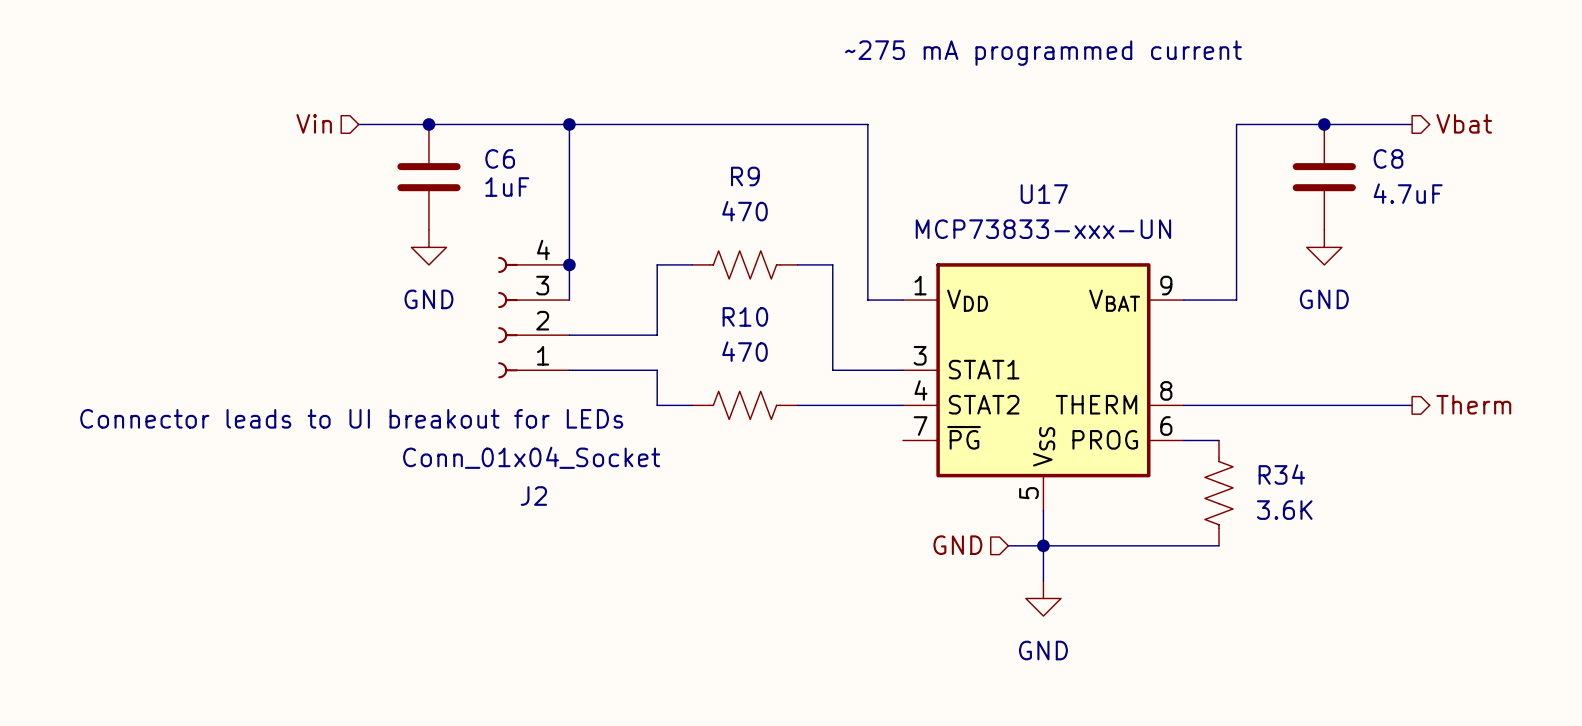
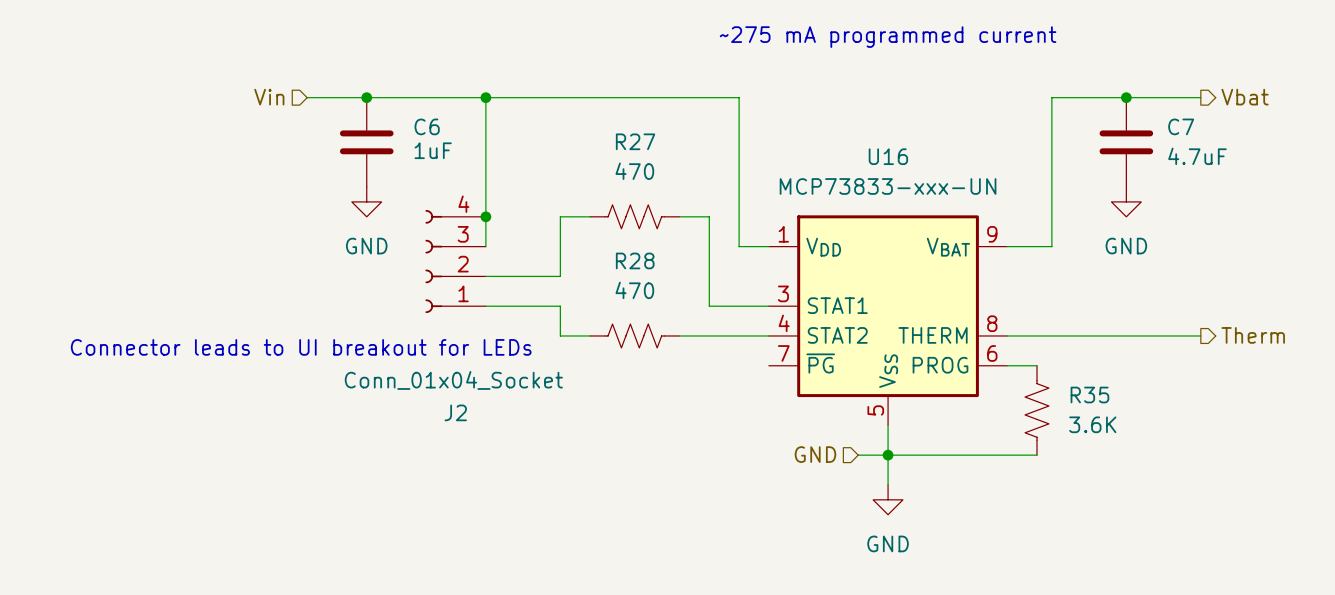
C8 name: C8 (1388, 158) -> C7 (1181, 126)
R9 name: R9 (745, 176) -> R27 (635, 141)
U17 name: U17 (1044, 194) -> U16 (888, 156)
R10 name: R10 (745, 316) -> R28 (635, 260)
R34 name: R34 (1281, 474) -> R35 (1089, 395)

